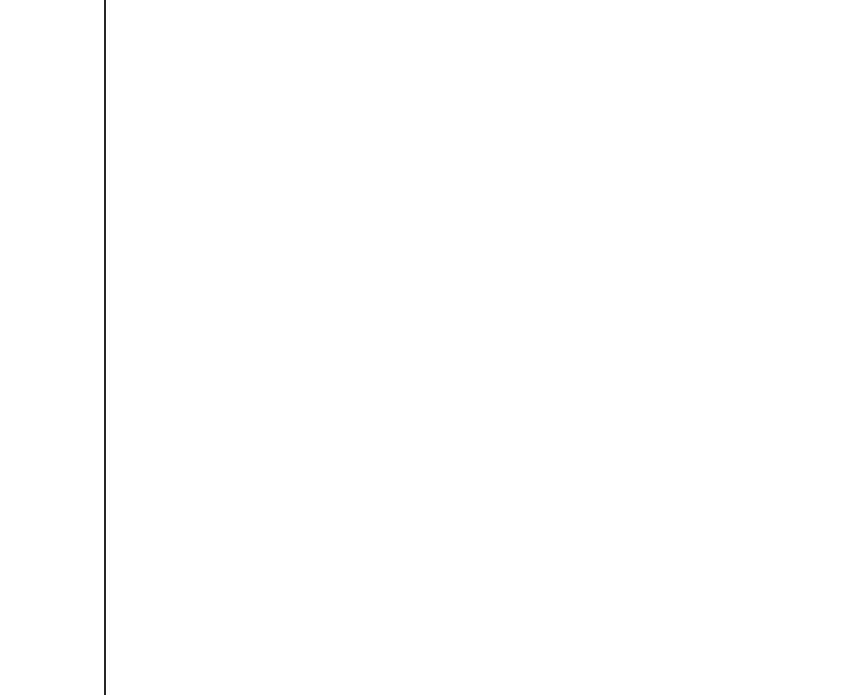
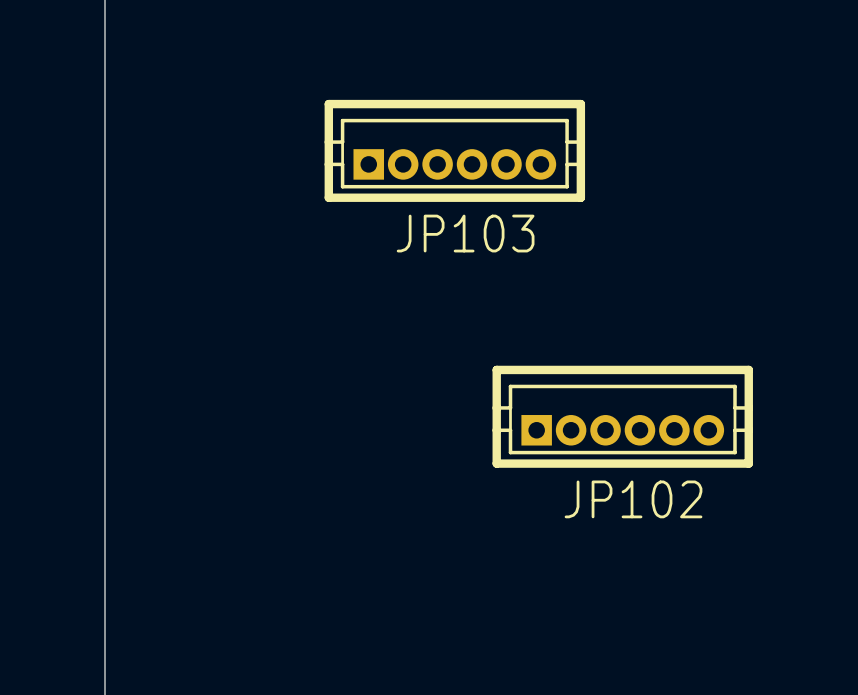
JP103: none -> (454, 150)
JP102: none -> (622, 416)

